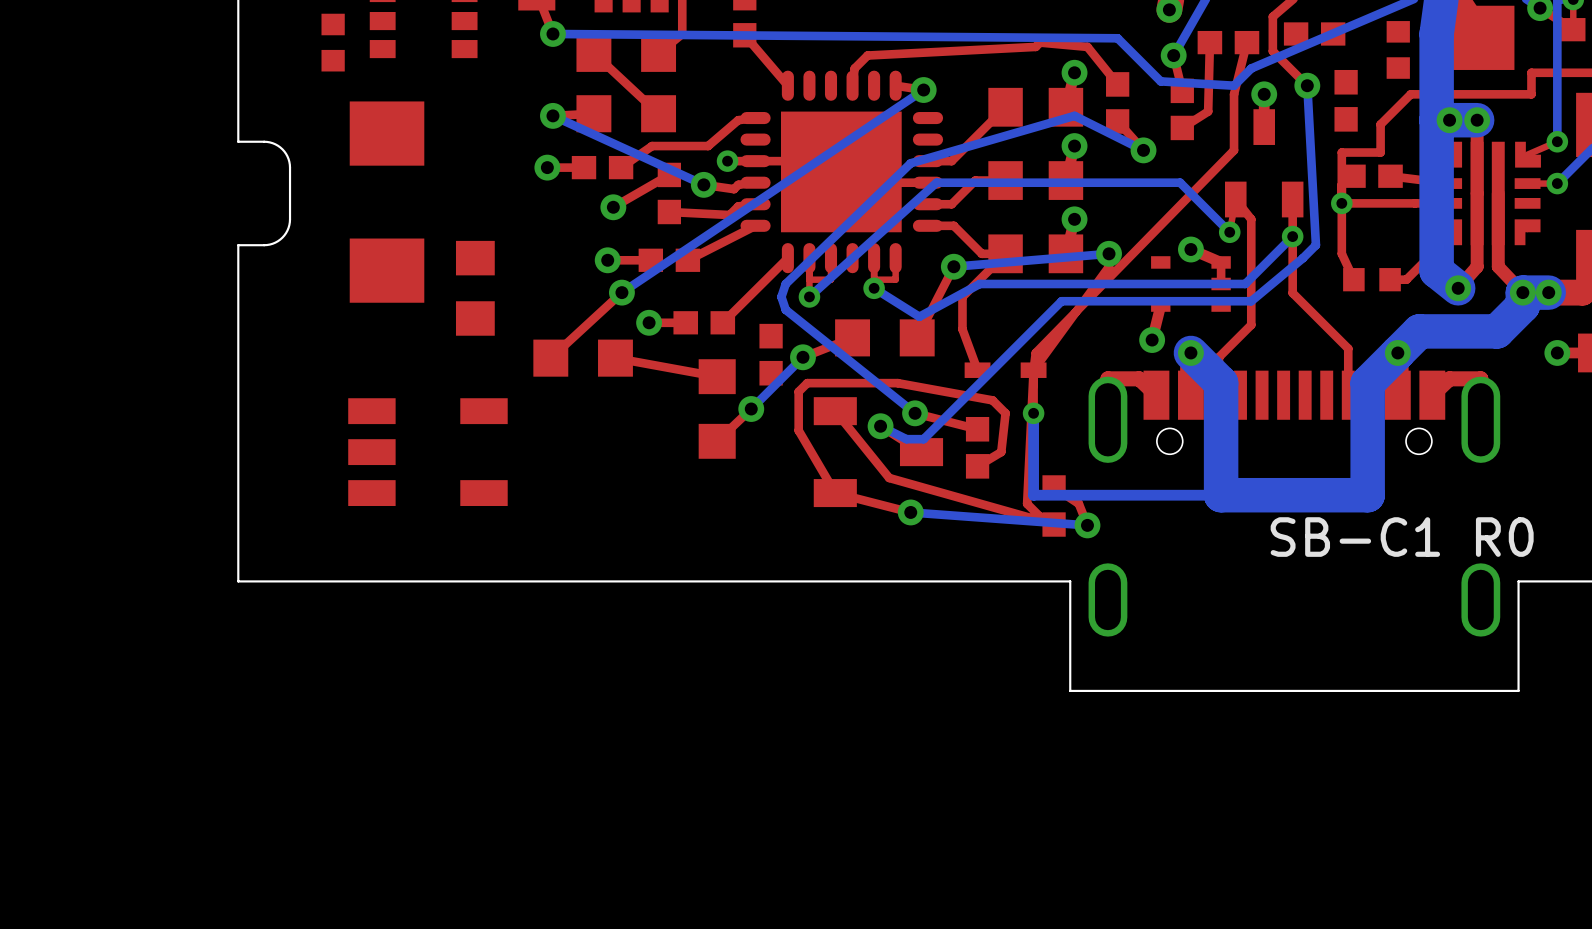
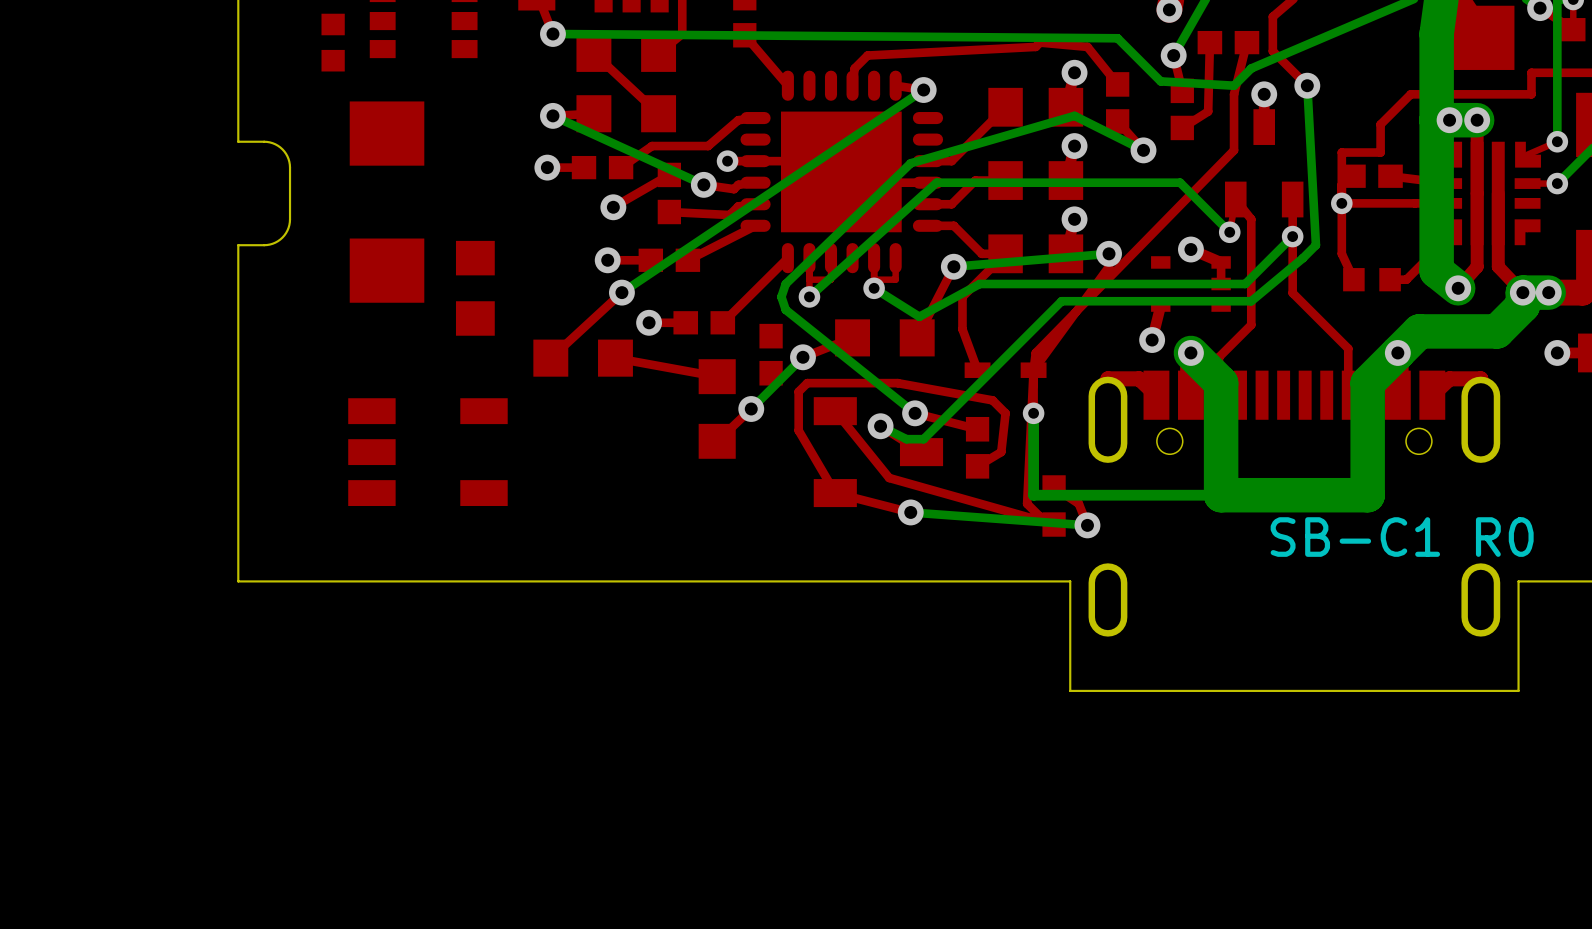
part: (1314, 33) -> none
part: (1398, 49) -> none
part: (1346, 100) -> none

